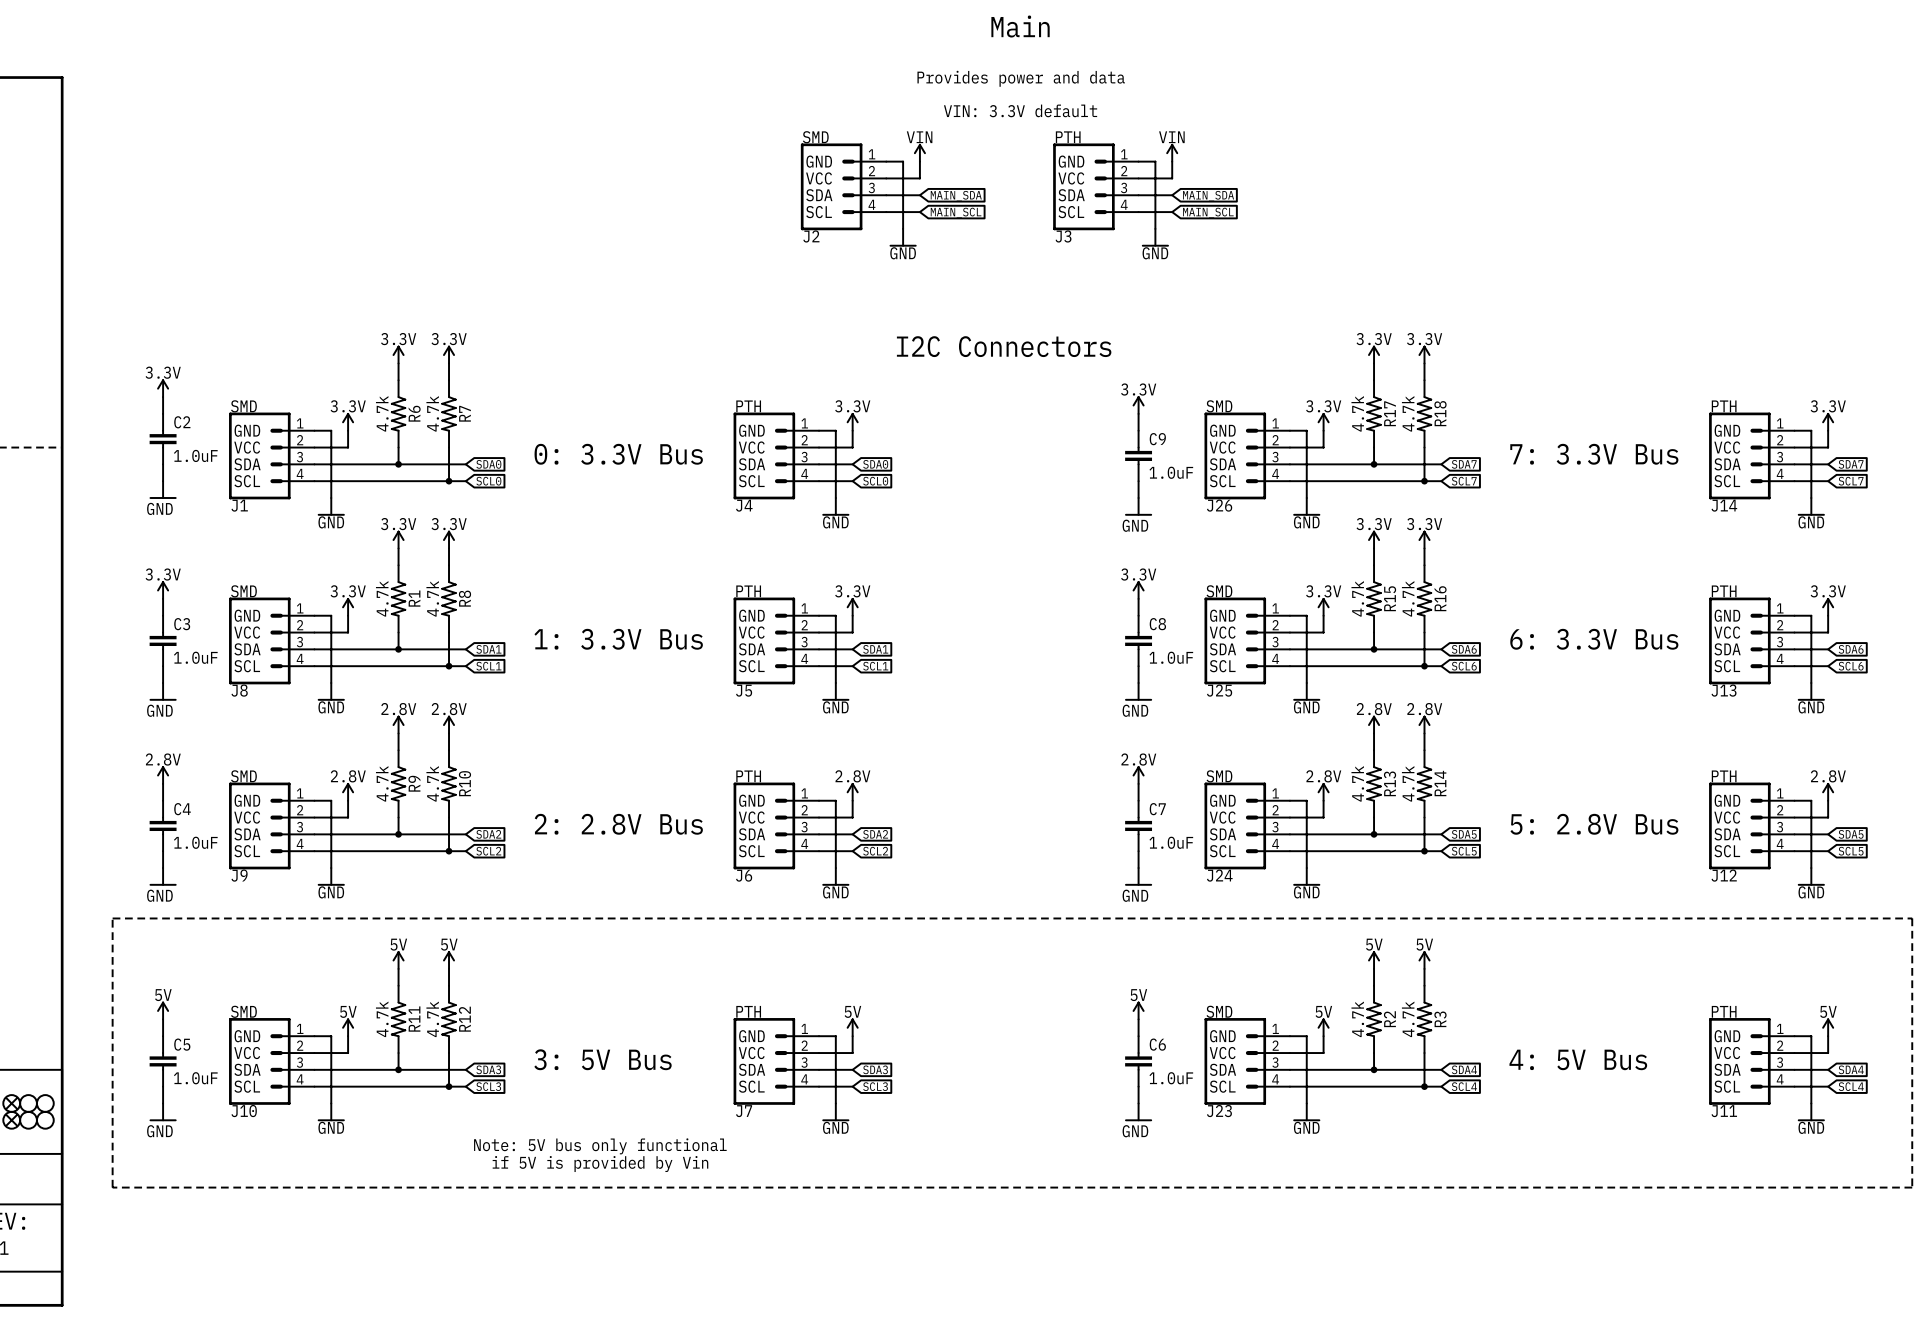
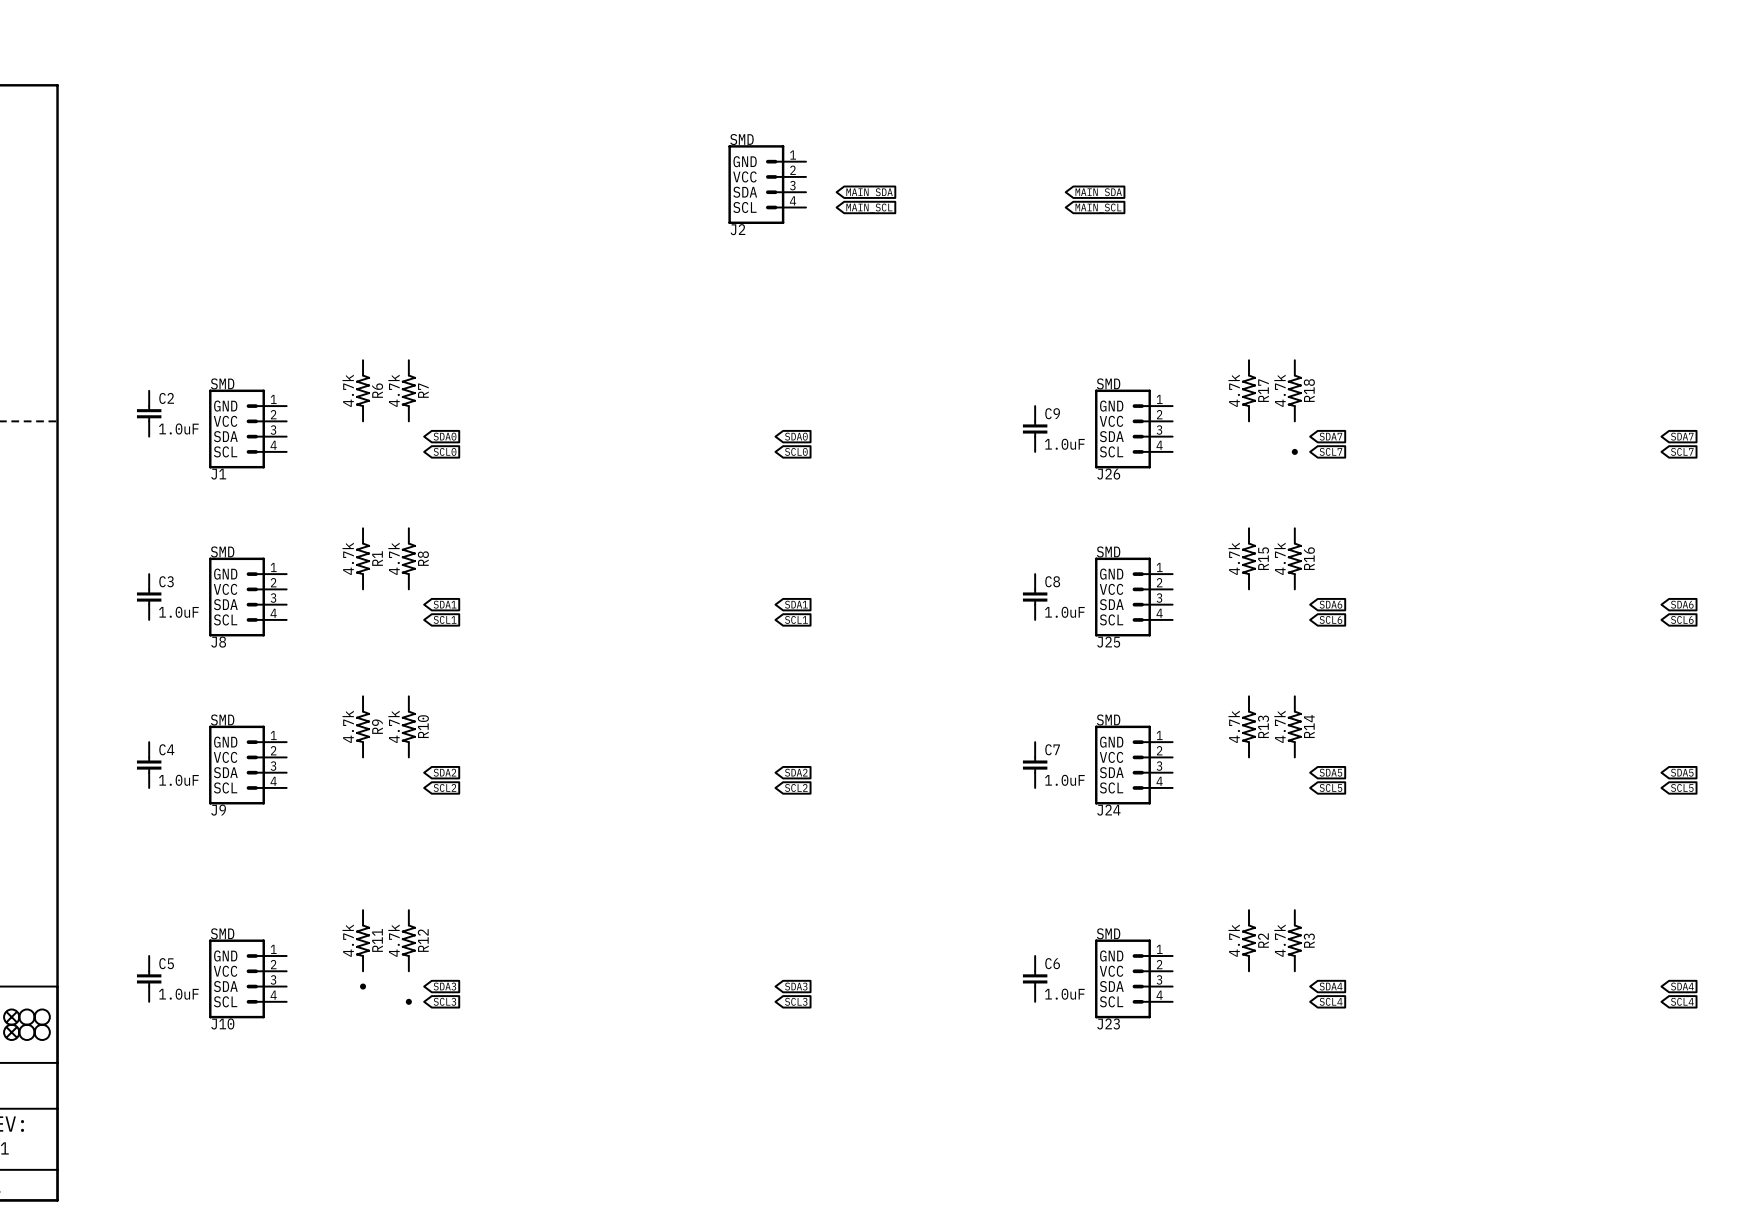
text: Main (1020, 26) -> none
text: Provides power and data (1021, 78) -> none
text: VIN: 3.3V default (1020, 110) -> none
power symbol: VIN (919, 152) -> none
power symbol: VIN (1172, 152) -> none
wire: (886, 161) (903, 161) (903, 228) -> none
wire: (919, 161) (919, 178) (886, 178) -> none
wire: (1138, 161) (1155, 161) (1155, 228) -> none
wire: (1172, 161) (1172, 178) (1138, 178) -> none
J3: PTH (1095, 186) -> none
wire: (886, 195) (919, 195) -> none
wire: (1138, 195) (1172, 195) -> none
wire: (886, 212) (919, 212) -> none
wire: (1138, 212) (1172, 212) -> none
power symbol: GND (903, 237) -> none
power symbol: GND (1155, 237) -> none
text: I2C Connectors (1004, 346) -> none
power symbol: 3.3V (398, 354) -> none
power symbol: 3.3V (449, 354) -> none
power symbol: 3.3V (1374, 354) -> none
power symbol: 3.3V (1424, 354) -> none
wire: (398, 363) (398, 380) -> none
wire: (449, 363) (449, 380) -> none
wire: (1374, 363) (1374, 380) -> none
wire: (1424, 363) (1424, 380) -> none
power symbol: 3.3V (163, 388) -> none
wire: (163, 397) (163, 413) -> none
power symbol: 3.3V (1138, 405) -> none
wire: (1138, 413) (1138, 430) -> none
power symbol: 3.3V (348, 421) -> none
power symbol: 3.3V (852, 421) -> none
power symbol: 3.3V (1323, 421) -> none
power symbol: 3.3V (1828, 421) -> none
wire: (314, 430) (331, 430) (331, 498) -> none
wire: (348, 430) (348, 447) (314, 447) -> none
wire: (819, 430) (835, 430) (835, 498) -> none
wire: (852, 430) (852, 447) (819, 447) -> none
wire: (1289, 430) (1306, 430) (1306, 498) -> none
wire: (1323, 430) (1323, 447) (1289, 447) -> none
wire: (1794, 430) (1811, 430) (1811, 498) -> none
wire: (1828, 430) (1828, 447) (1794, 447) -> none
wire: (398, 447) (398, 464) -> none
wire: (449, 447) (449, 481) -> none
wire: (1374, 447) (1374, 464) -> none
wire: (1424, 447) (1424, 481) -> none
text: 0: 3.3V Bus (618, 454) -> none
text: 7: 3.3V Bus (1594, 454) -> none
J4: PTH (776, 455) -> none
J14: PTH (1751, 455) -> none
wire: (163, 464) (163, 481) -> none
wire: (314, 464) (465, 464) -> none
junction: (398, 464) -> none
wire: (819, 464) (852, 464) -> none
wire: (1289, 464) (1441, 464) -> none
junction: (1374, 464) -> none
wire: (1794, 464) (1828, 464) -> none
wire: (314, 481) (465, 481) -> none
junction: (449, 481) -> none
wire: (819, 481) (852, 481) -> none
wire: (1138, 481) (1138, 498) -> none
wire: (1289, 481) (1441, 481) -> none
wire: (1794, 481) (1828, 481) -> none
power symbol: GND (163, 490) -> none
power symbol: GND (331, 506) -> none
power symbol: GND (835, 506) -> none
power symbol: GND (1138, 506) -> none
power symbol: GND (1306, 506) -> none
power symbol: GND (1811, 506) -> none
power symbol: 3.3V (398, 539) -> none
power symbol: 3.3V (449, 539) -> none
power symbol: 3.3V (1374, 539) -> none
power symbol: 3.3V (1424, 539) -> none
wire: (398, 548) (398, 565) -> none
wire: (449, 548) (449, 565) -> none
wire: (1374, 548) (1374, 565) -> none
wire: (1424, 548) (1424, 565) -> none
power symbol: 3.3V (163, 590) -> none
power symbol: 3.3V (1138, 590) -> none
wire: (163, 598) (163, 615) -> none
wire: (1138, 598) (1138, 615) -> none
power symbol: 3.3V (348, 606) -> none
power symbol: 3.3V (852, 606) -> none
power symbol: 3.3V (1323, 606) -> none
power symbol: 3.3V (1828, 606) -> none
wire: (314, 615) (331, 615) (331, 683) -> none
wire: (348, 615) (348, 632) (314, 632) -> none
wire: (819, 615) (835, 615) (835, 683) -> none
wire: (852, 615) (852, 632) (819, 632) -> none
wire: (1289, 615) (1306, 615) (1306, 683) -> none
wire: (1323, 615) (1323, 632) (1289, 632) -> none
wire: (1794, 615) (1811, 615) (1811, 683) -> none
wire: (1828, 615) (1828, 632) (1794, 632) -> none
wire: (398, 632) (398, 649) -> none
wire: (449, 632) (449, 666) -> none
wire: (1374, 632) (1374, 649) -> none
wire: (1424, 632) (1424, 666) -> none
text: 1: 3.3V Bus (618, 639) -> none
text: 6: 3.3V Bus (1594, 639) -> none
J5: PTH (776, 640) -> none
J13: PTH (1751, 640) -> none
wire: (314, 649) (465, 649) -> none
junction: (398, 649) -> none
wire: (819, 649) (852, 649) -> none
wire: (1289, 649) (1441, 649) -> none
junction: (1374, 649) -> none
wire: (1794, 649) (1828, 649) -> none
wire: (163, 666) (163, 683) -> none
wire: (314, 666) (465, 666) -> none
junction: (449, 666) -> none
wire: (819, 666) (852, 666) -> none
wire: (1138, 666) (1138, 683) -> none
wire: (1289, 666) (1441, 666) -> none
junction: (1424, 666) -> none
wire: (1794, 666) (1828, 666) -> none
power symbol: GND (163, 691) -> none
power symbol: GND (331, 691) -> none
power symbol: GND (835, 691) -> none
power symbol: GND (1138, 691) -> none
power symbol: GND (1306, 691) -> none
power symbol: GND (1811, 691) -> none
power symbol: 2.8V (398, 724) -> none
power symbol: 2.8V (449, 724) -> none
power symbol: 2.8V (1374, 724) -> none
power symbol: 2.8V (1424, 724) -> none
wire: (398, 733) (398, 750) -> none
wire: (449, 733) (449, 750) -> none
wire: (1374, 733) (1374, 750) -> none
wire: (1424, 733) (1424, 750) -> none
power symbol: 2.8V (163, 775) -> none
power symbol: 2.8V (1138, 775) -> none
wire: (163, 783) (163, 800) -> none
wire: (1138, 783) (1138, 800) -> none
power symbol: 2.8V (348, 791) -> none
power symbol: 2.8V (852, 791) -> none
power symbol: 2.8V (1323, 791) -> none
power symbol: 2.8V (1828, 791) -> none
wire: (314, 800) (331, 800) (331, 868) -> none
wire: (348, 800) (348, 817) (314, 817) -> none
wire: (819, 800) (835, 800) (835, 868) -> none
wire: (852, 800) (852, 817) (819, 817) -> none
wire: (1289, 800) (1306, 800) (1306, 868) -> none
wire: (1323, 800) (1323, 817) (1289, 817) -> none
wire: (1794, 800) (1811, 800) (1811, 868) -> none
wire: (1828, 800) (1828, 817) (1794, 817) -> none
wire: (398, 817) (398, 834) -> none
wire: (449, 817) (449, 851) -> none
wire: (1374, 817) (1374, 834) -> none
wire: (1424, 817) (1424, 851) -> none
text: 2: 2.8V Bus (618, 824) -> none
text: 5: 2.8V Bus (1594, 824) -> none
J6: PTH (776, 825) -> none
J12: PTH (1751, 825) -> none
wire: (314, 834) (465, 834) -> none
junction: (398, 834) -> none
wire: (819, 834) (852, 834) -> none
wire: (1289, 834) (1441, 834) -> none
junction: (1374, 834) -> none
wire: (1794, 834) (1828, 834) -> none
wire: (163, 851) (163, 868) -> none
wire: (314, 851) (465, 851) -> none
junction: (449, 851) -> none
wire: (819, 851) (852, 851) -> none
wire: (1138, 851) (1138, 868) -> none
wire: (1289, 851) (1441, 851) -> none
junction: (1424, 851) -> none
wire: (1794, 851) (1828, 851) -> none
power symbol: GND (163, 876) -> none
power symbol: GND (331, 876) -> none
power symbol: GND (835, 876) -> none
power symbol: GND (1138, 876) -> none
power symbol: GND (1306, 876) -> none
power symbol: GND (1811, 876) -> none
line: (112, 918) (1912, 918) (1912, 1187) (112, 1187) (112, 918) -> none
power symbol: 5V (398, 960) -> none
power symbol: 5V (449, 960) -> none
power symbol: 5V (1374, 960) -> none
power symbol: 5V (1424, 960) -> none
wire: (398, 968) (398, 985) -> none
wire: (449, 968) (449, 985) -> none
wire: (1374, 968) (1374, 985) -> none
wire: (1424, 968) (1424, 985) -> none
power symbol: 5V (163, 1010) -> none
power symbol: 5V (1138, 1010) -> none
wire: (163, 1019) (163, 1036) -> none
wire: (1138, 1019) (1138, 1036) -> none
power symbol: 5V (348, 1027) -> none
power symbol: 5V (852, 1027) -> none
power symbol: 5V (1323, 1027) -> none
power symbol: 5V (1828, 1027) -> none
wire: (314, 1036) (331, 1036) (331, 1103) -> none
wire: (348, 1036) (348, 1053) (314, 1053) -> none
wire: (819, 1036) (835, 1036) (835, 1103) -> none
wire: (852, 1036) (852, 1053) (819, 1053) -> none
wire: (1289, 1036) (1306, 1036) (1306, 1103) -> none
wire: (1323, 1036) (1323, 1053) (1289, 1053) -> none
wire: (1794, 1036) (1811, 1036) (1811, 1103) -> none
wire: (1828, 1036) (1828, 1053) (1794, 1053) -> none
wire: (398, 1053) (398, 1069) -> none
wire: (449, 1053) (449, 1086) -> none
wire: (1374, 1053) (1374, 1069) -> none
wire: (1424, 1053) (1424, 1086) -> none
text: 3: 5V Bus (603, 1059) -> none
text: 4: 5V Bus (1578, 1059) -> none
J7: PTH (776, 1061) -> none
J11: PTH (1751, 1061) -> none
wire: (314, 1069) (465, 1069) -> none
wire: (819, 1069) (852, 1069) -> none
wire: (1289, 1069) (1441, 1069) -> none
junction: (1374, 1069) -> none
wire: (1794, 1069) (1828, 1069) -> none
wire: (163, 1086) (163, 1103) -> none
wire: (314, 1086) (465, 1086) -> none
wire: (819, 1086) (852, 1086) -> none
wire: (1138, 1086) (1138, 1103) -> none
wire: (1289, 1086) (1441, 1086) -> none
junction: (1424, 1086) -> none
wire: (1794, 1086) (1828, 1086) -> none
power symbol: GND (163, 1112) -> none
power symbol: GND (331, 1112) -> none
power symbol: GND (835, 1112) -> none
power symbol: GND (1138, 1112) -> none
power symbol: GND (1306, 1112) -> none
power symbol: GND (1811, 1112) -> none
text: Note: 5V bus only functional (600, 1146) -> none
text: if 5V is provided by Vin (600, 1164) -> none

